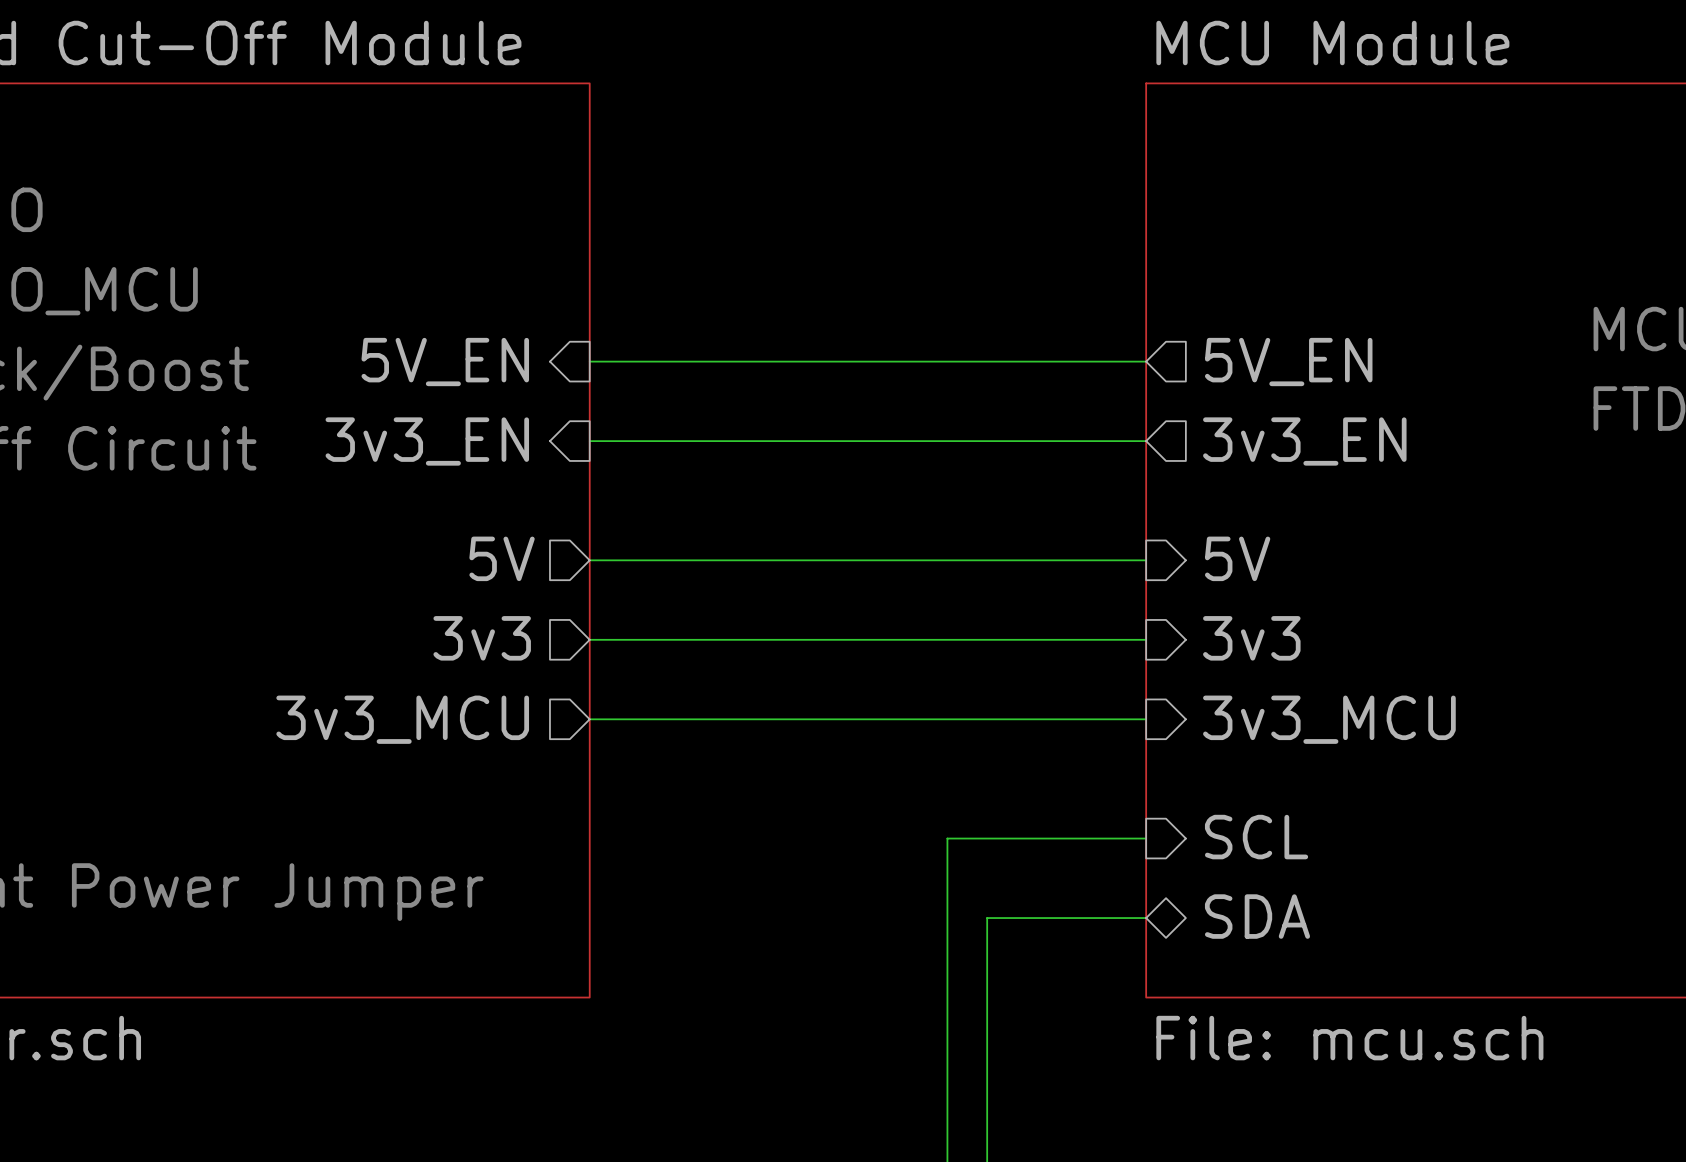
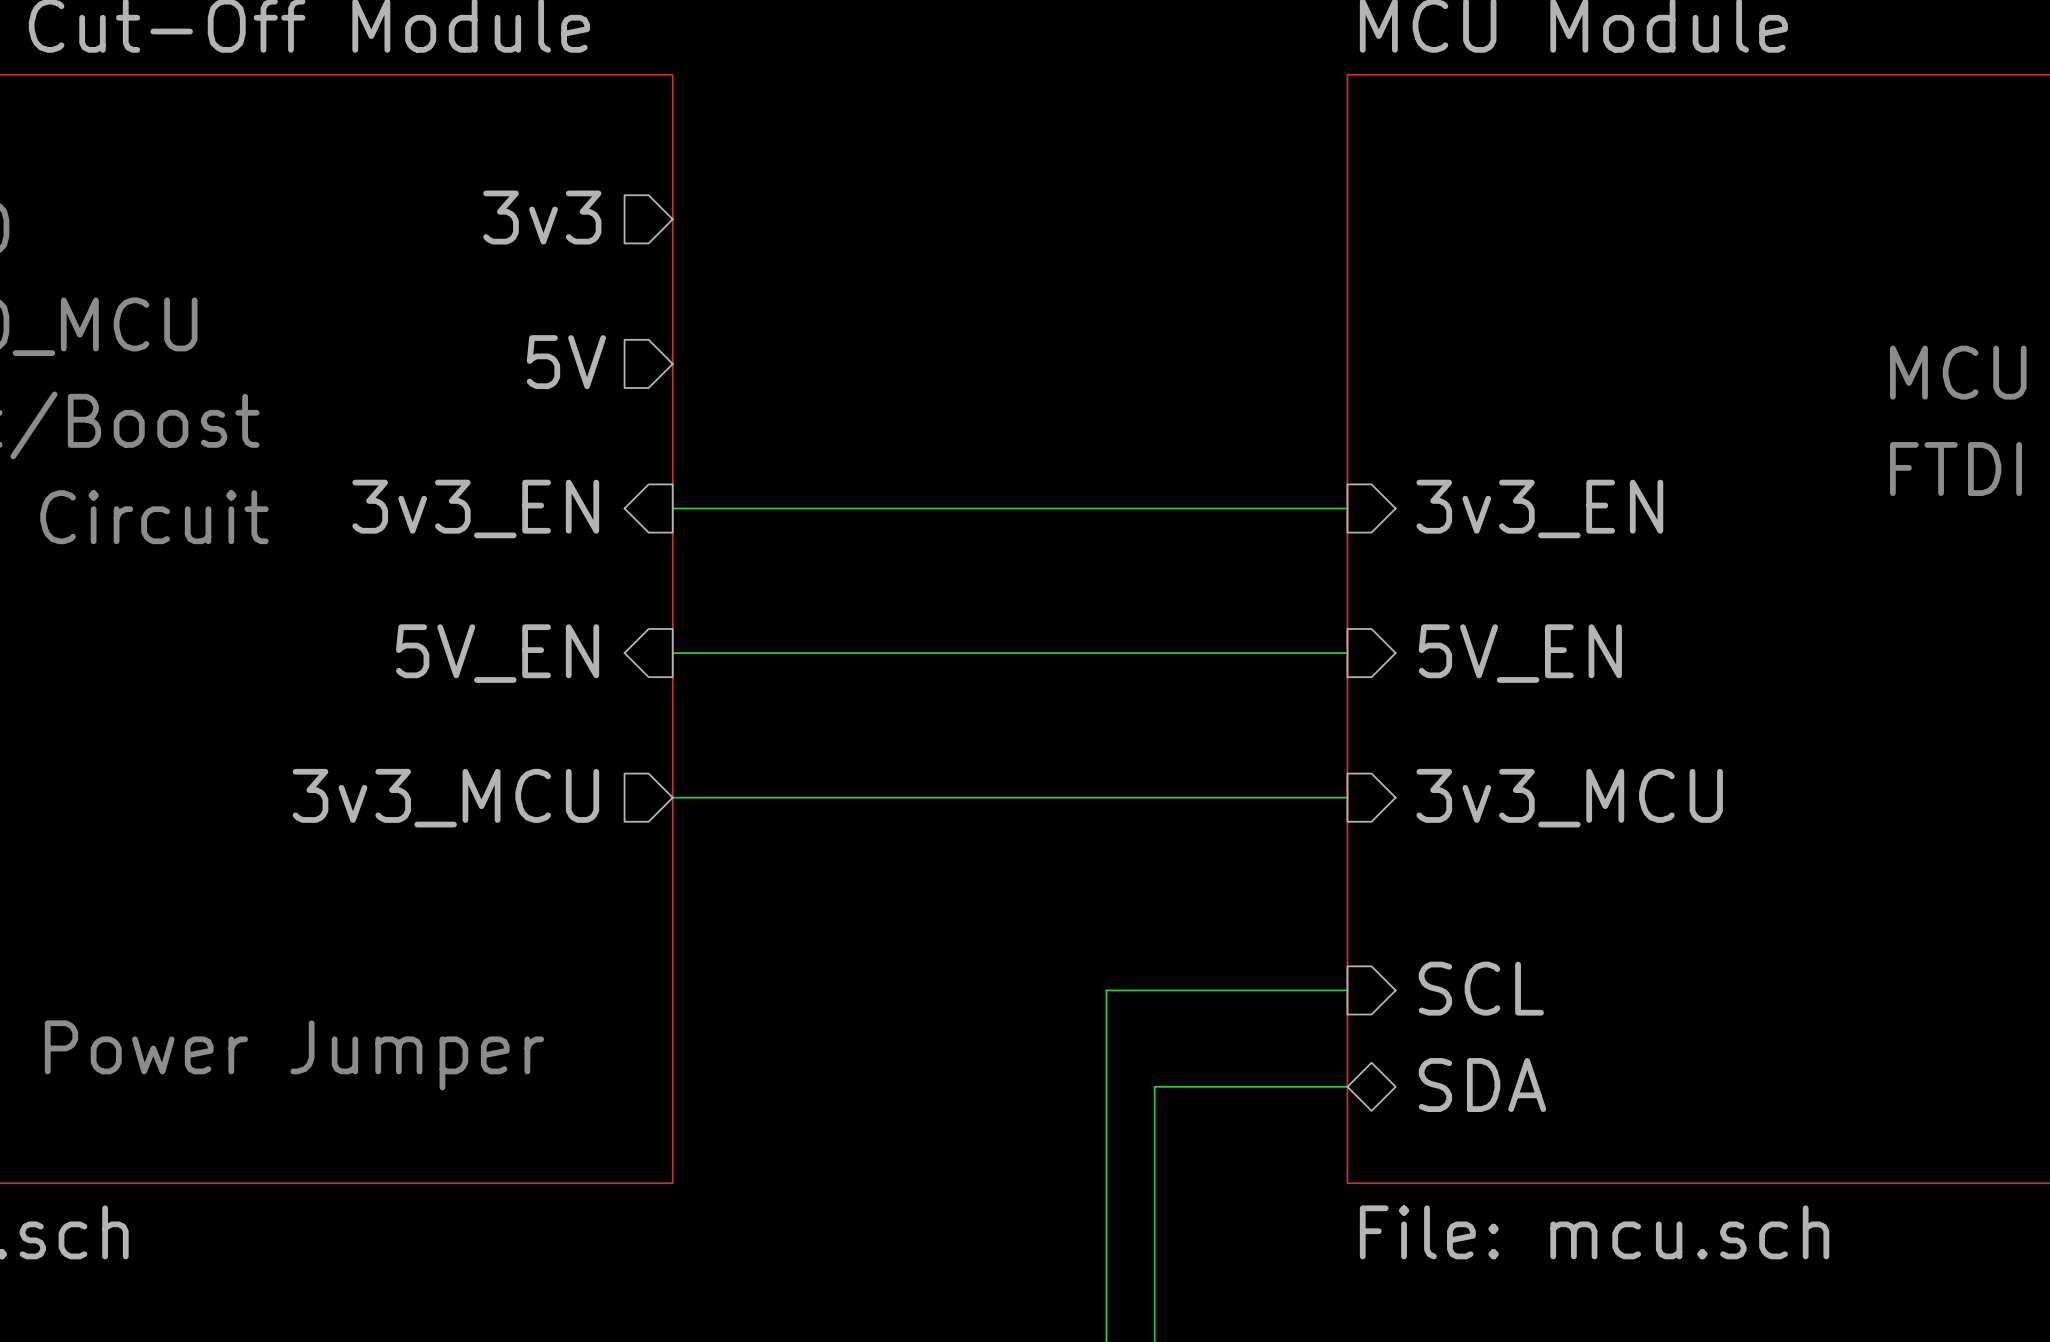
sheet pin: none -> 3v3 (542, 217)
sheet pin: none -> 5V (566, 362)
wire: (589, 361) (1146, 361) -> none
sheet pin: 5V_EN (445, 362) -> none
sheet pin: 5V_EN (1288, 362) -> none
sheet pin shape: output (1304, 441) -> input (1539, 508)
sheet pin shape: output (502, 558) -> input (497, 653)
sheet pin: 5V (502, 558) -> 5V_EN (497, 653)
sheet pin: 5V (1237, 558) -> 5V_EN (1520, 653)
sheet pin: 3v3 (482, 638) -> none
sheet pin: 3v3 (1251, 638) -> none
wire: (589, 639) (1146, 639) -> (672, 797) (1347, 797)
sheet pin position: 3v3_MCU (402, 719) -> 3v3_MCU (445, 798)
wire: (589, 719) (1146, 719) -> none
sheet pin position: 3v3_MCU (1329, 719) -> 3v3_MCU (1569, 798)

